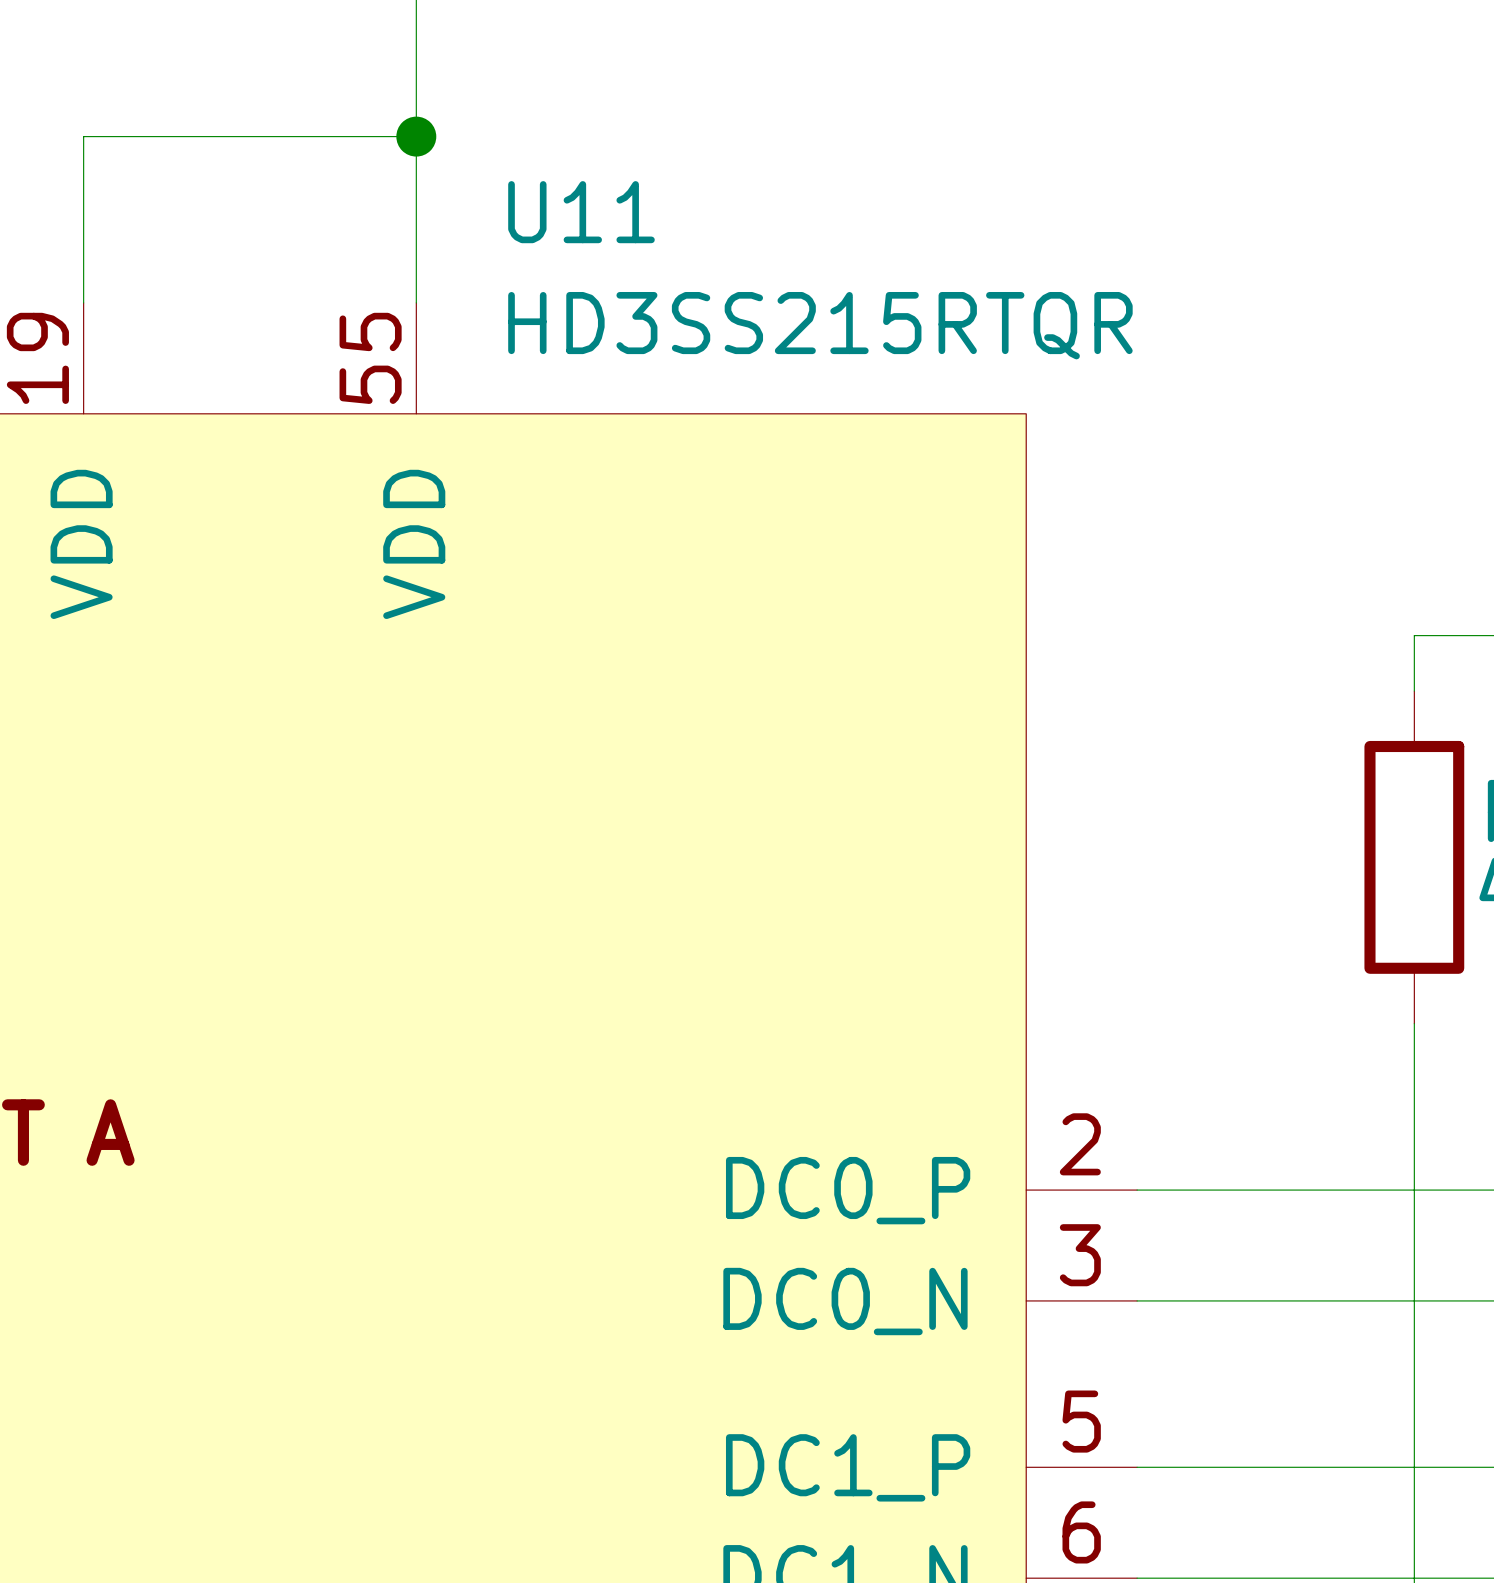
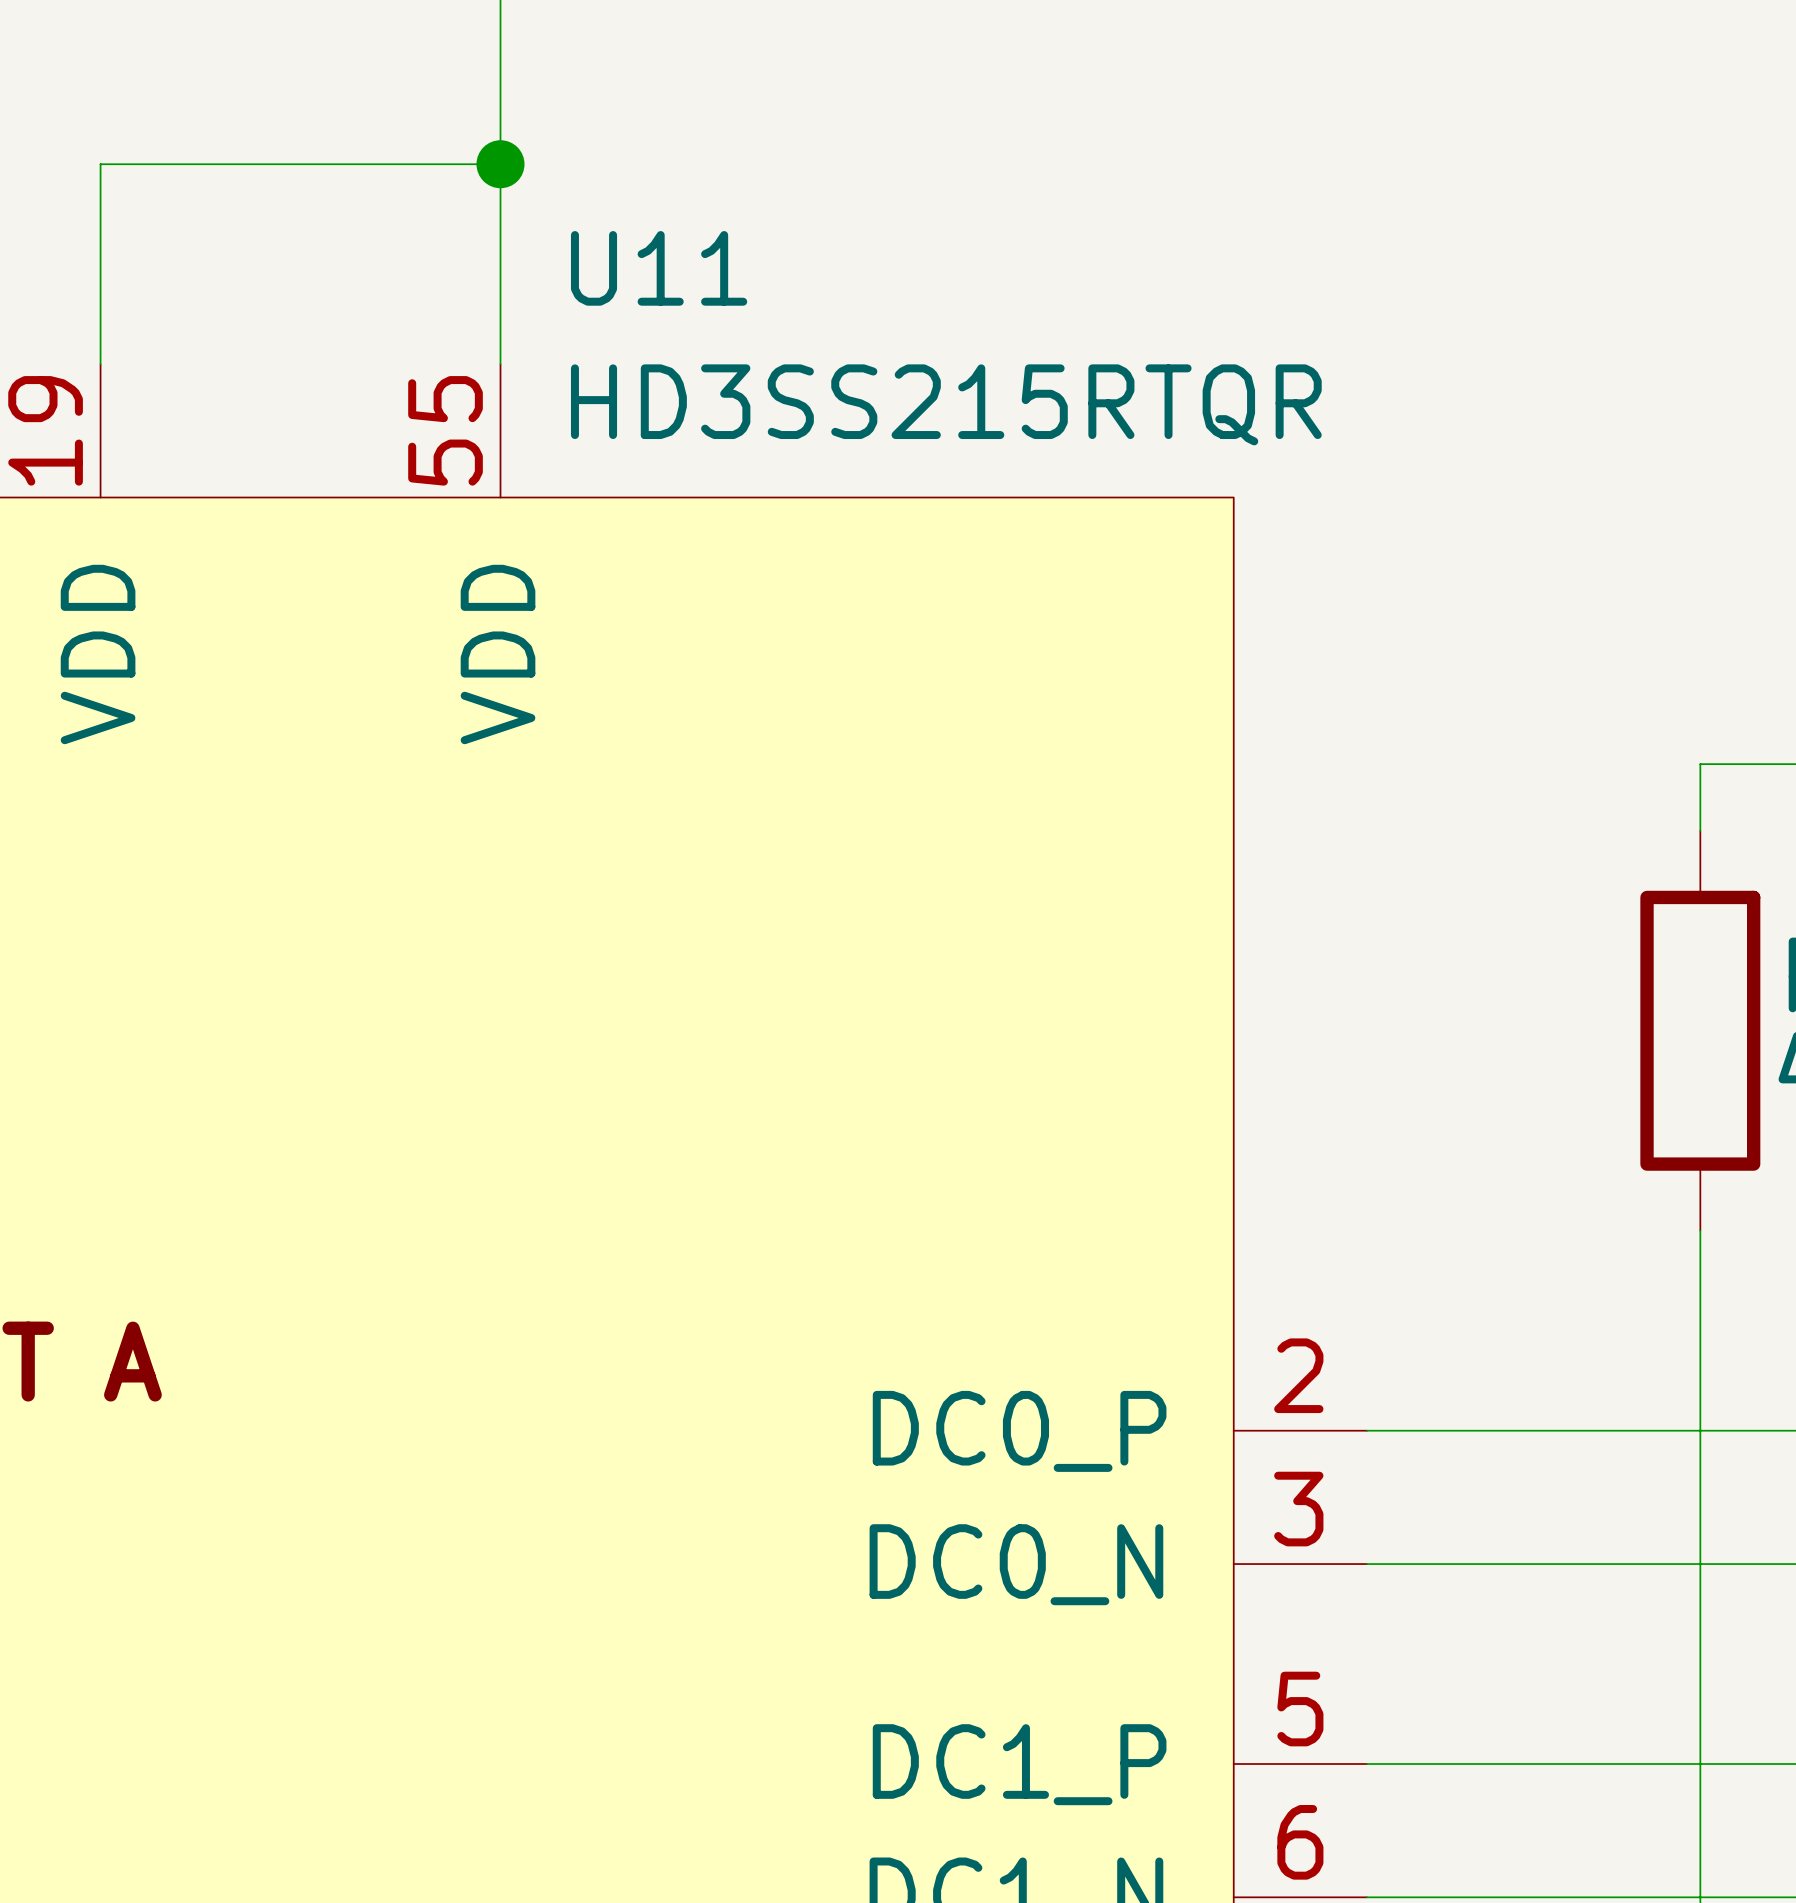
U11 name position: U11 (581, 212) -> U11 (659, 268)
U11 value position: HD3SS215RTQR (820, 325) -> HD3SS215RTQR (946, 404)

